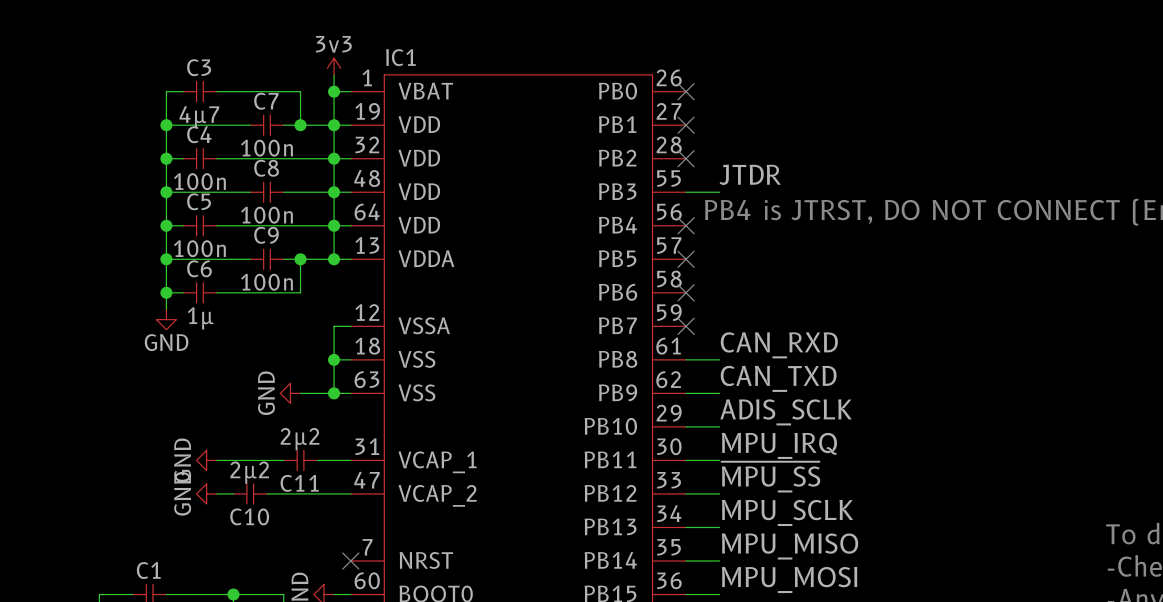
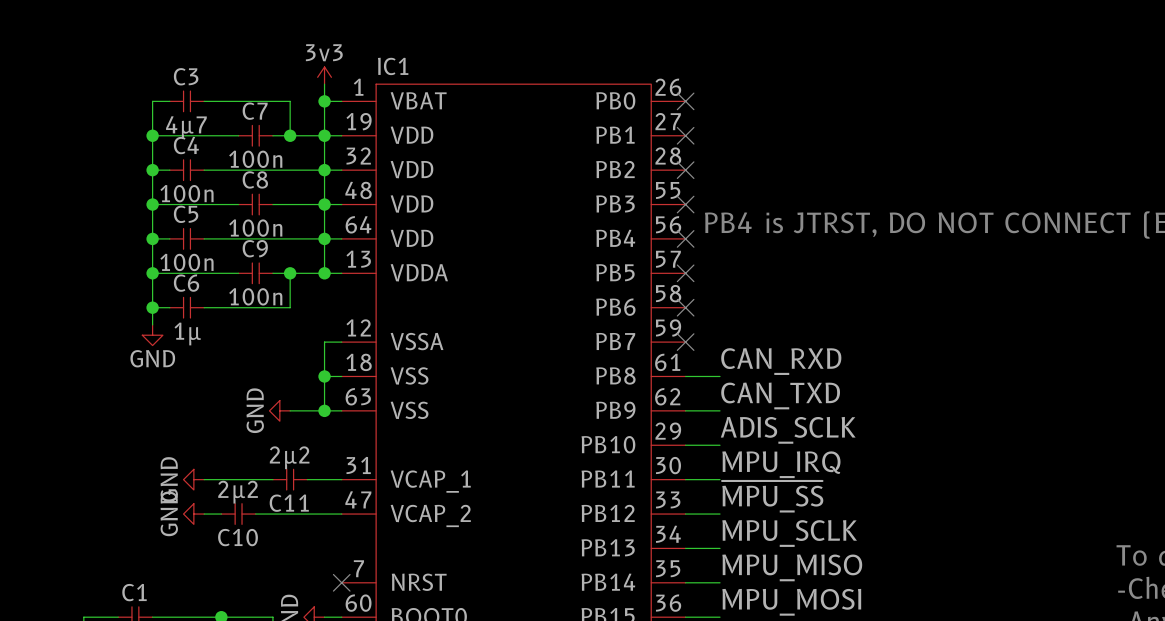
label: JTDR (750, 174) -> none
wire: (686, 192) (719, 192) -> none
no-connect mark: none -> (685, 204)

